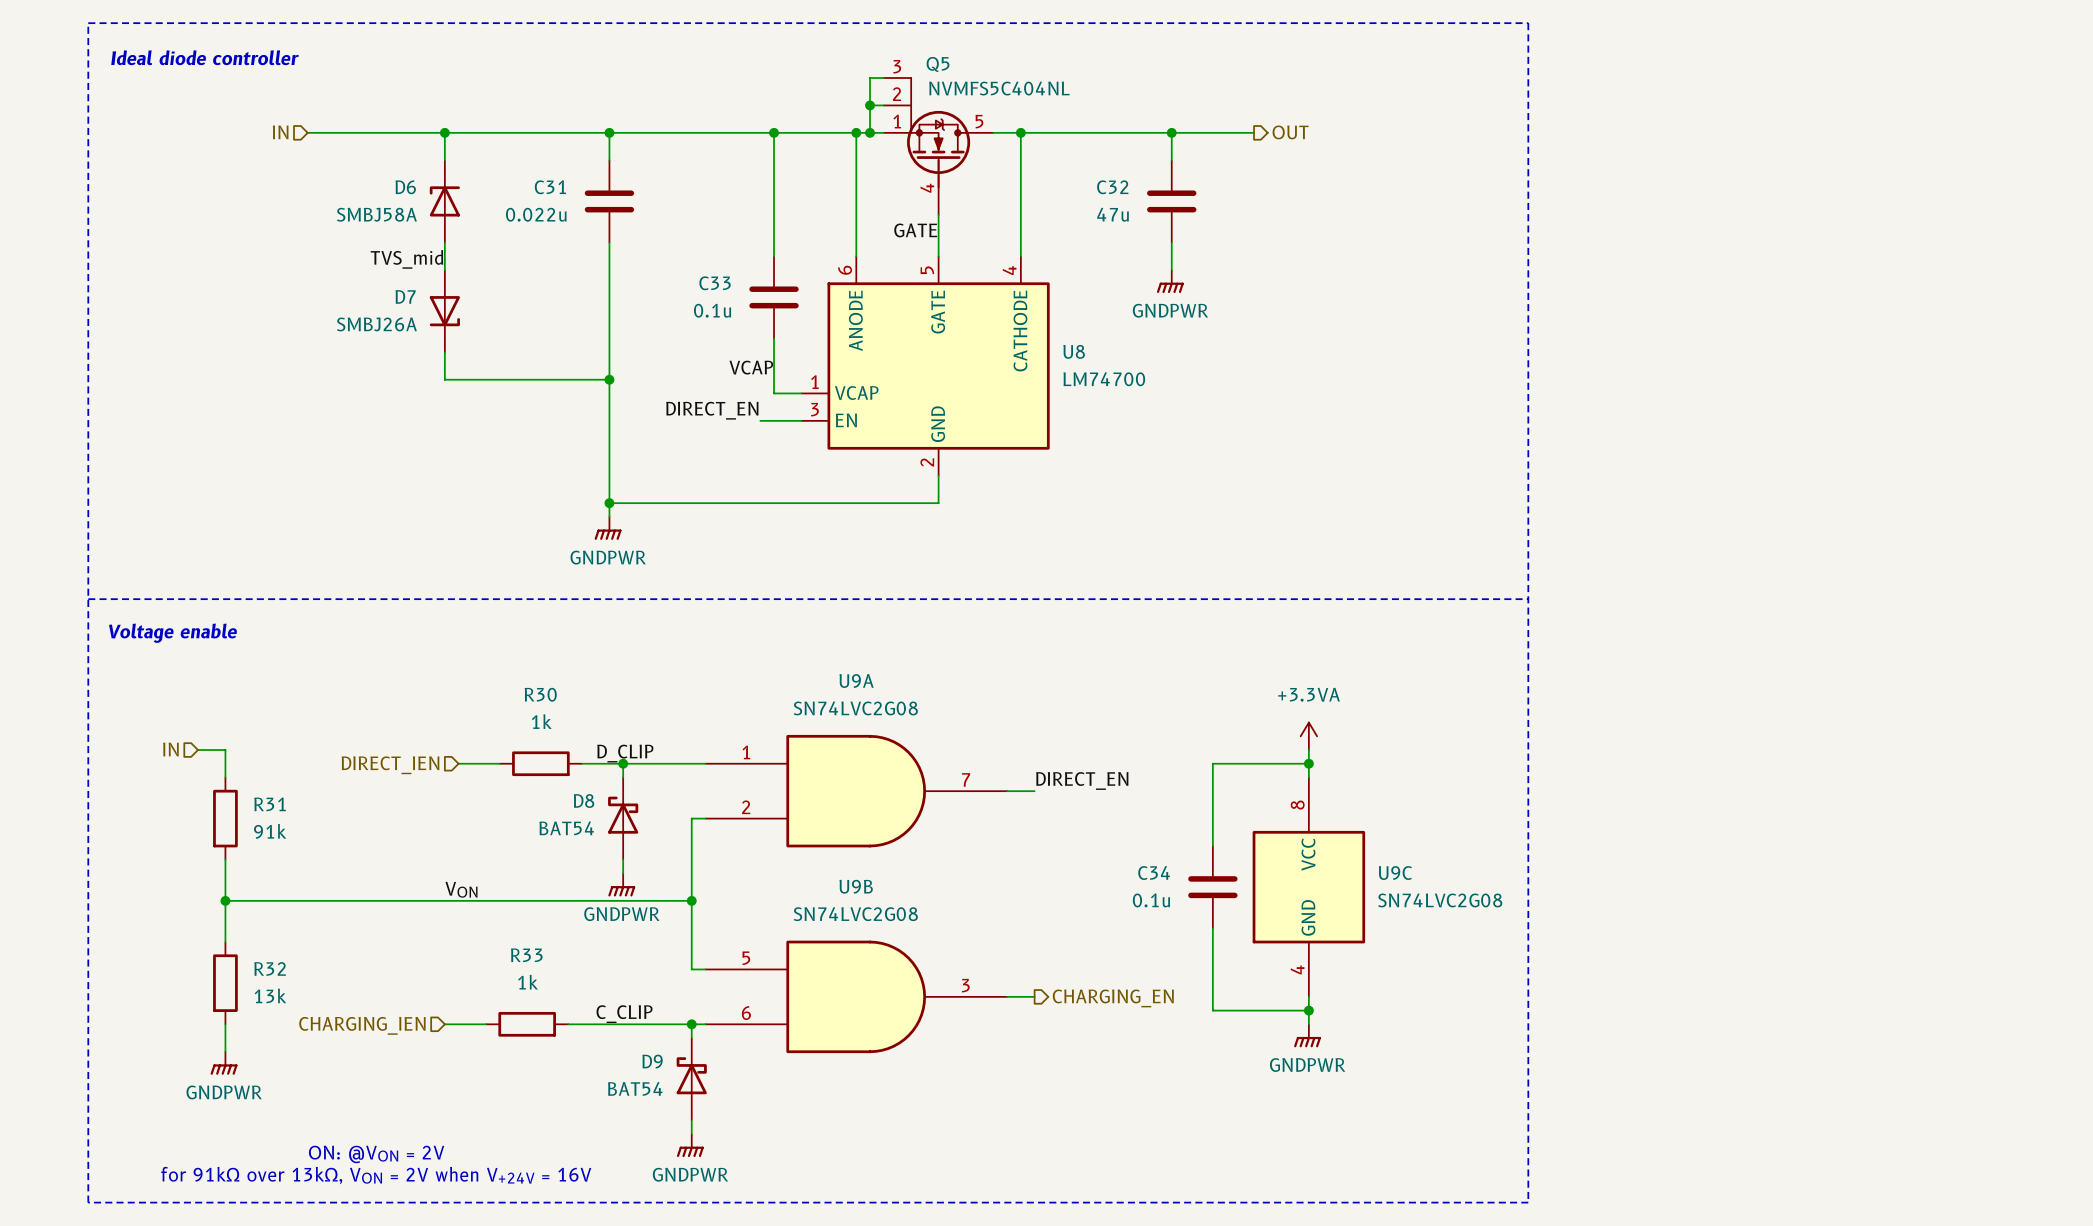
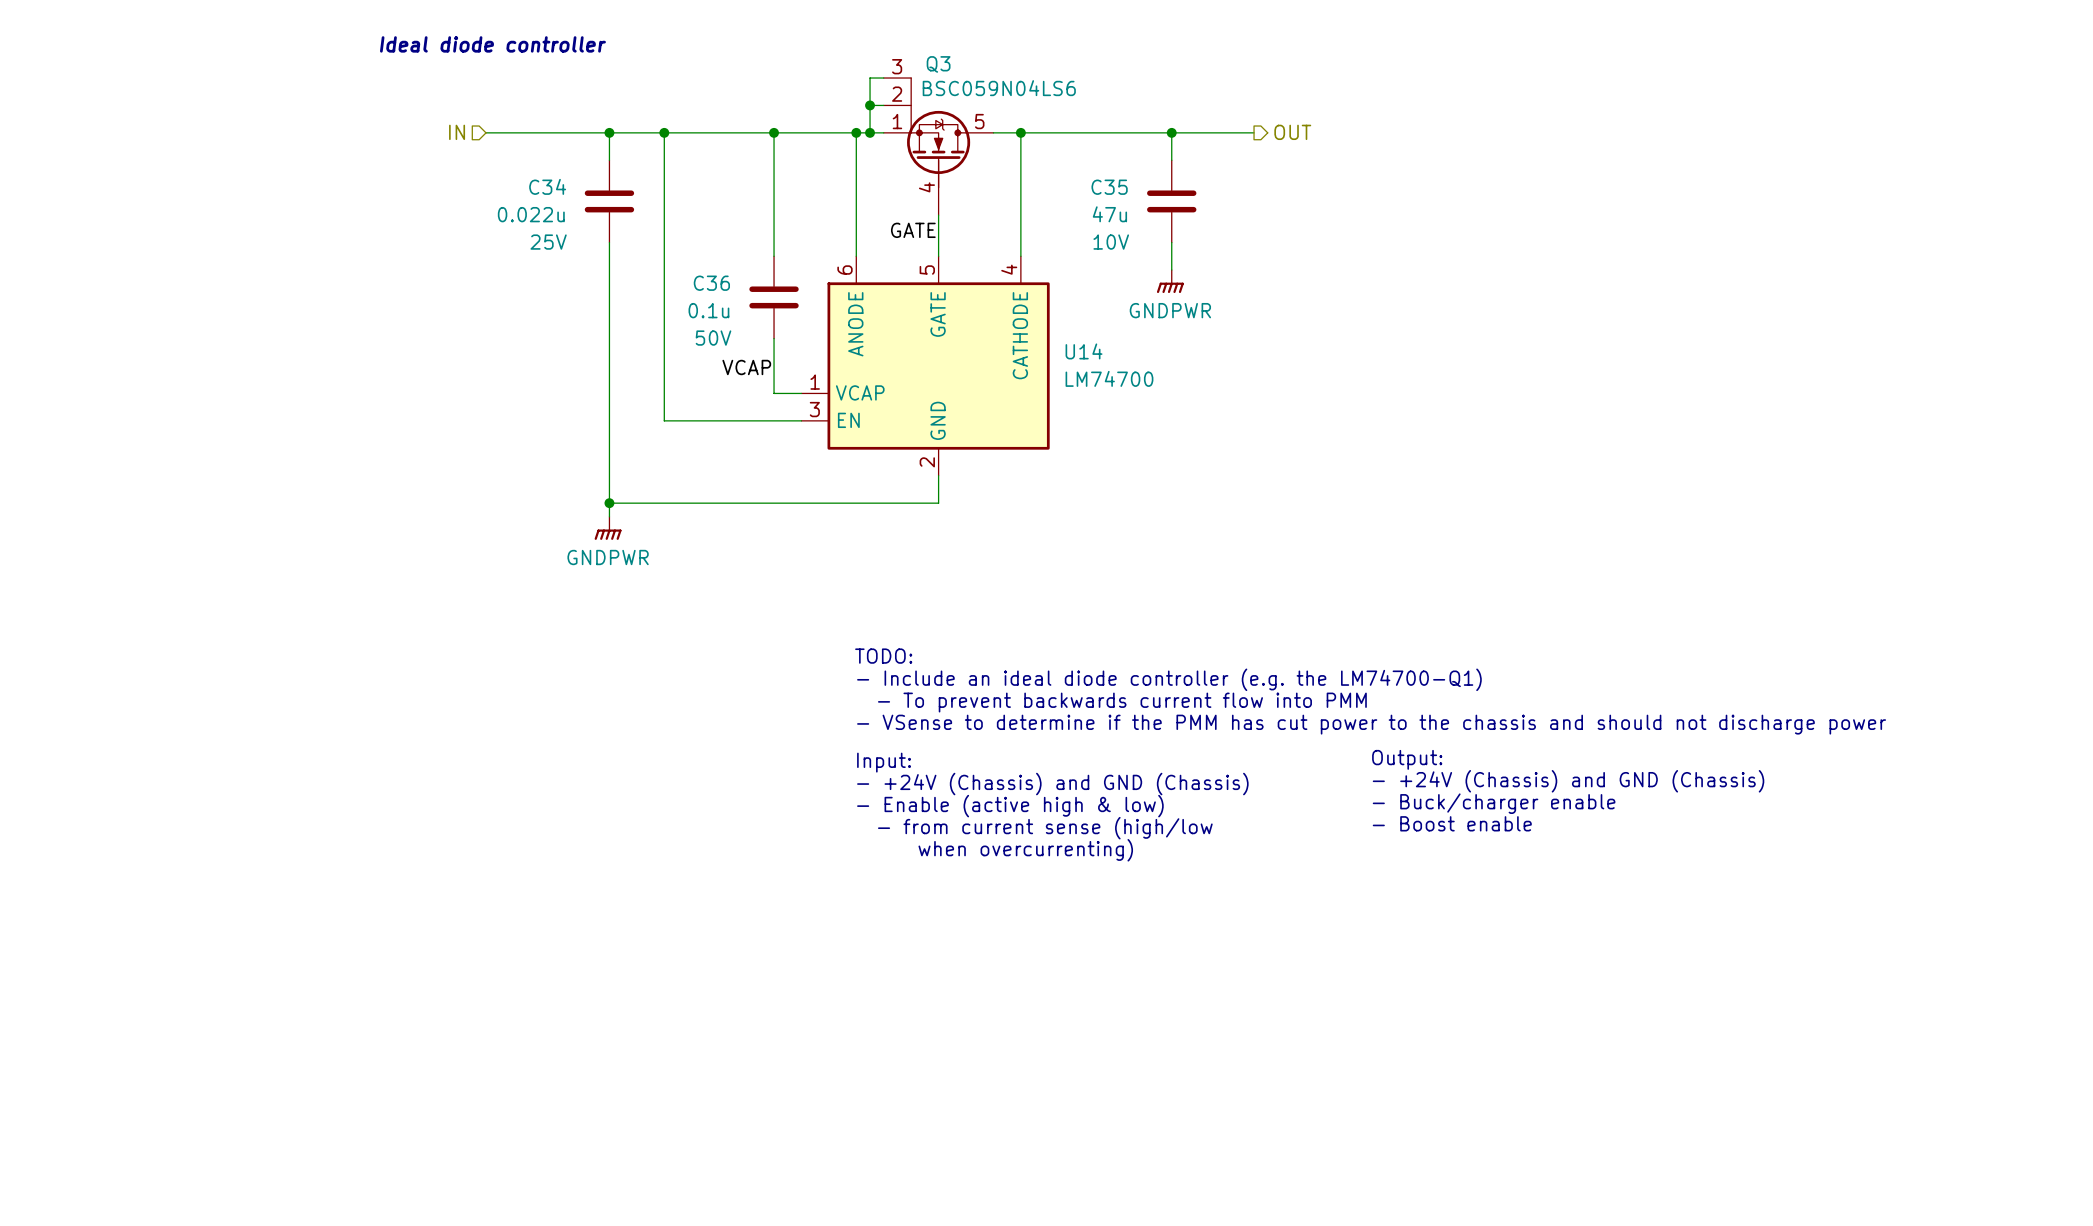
line: (88, 23) (1528, 23) (1528, 1202) (88, 1202) (88, 23) -> none
text position: Ideal diode controller (204, 57) -> Ideal diode controller (492, 44)
Q5 name: Q5 (938, 64) -> Q3 (938, 64)
Q5 value: NVMFS5C404NL (999, 88) -> BSC059N04LS6 (999, 88)
hierarchical label position: IN (280, 132) -> IN (457, 132)
wire: (307, 132) (486, 132) -> none
wire: (444, 132) (444, 160) -> none
junction: (444, 132) -> none
wire: none -> (664, 132) (664, 420) (760, 420)
junction: none -> (664, 132)
C31 name: C31 (550, 187) -> C34 (547, 186)
C32 name: C32 (1112, 187) -> C35 (1109, 187)
D6: SMBJ58A (444, 201) -> none
wire: (444, 242) (444, 270) -> none
C31 text: none -> 25V (548, 242)
C32 text: none -> 10V (1111, 242)
label: TVS_mid (406, 259) -> none
C33 name: C33 (715, 283) -> C36 (711, 283)
D7: SMBJ26A (444, 311) -> none
C33 text: none -> 50V (713, 338)
U8 name: U8 (1074, 351) -> U14 (1084, 351)
wire: (444, 352) (444, 379) (609, 379) -> none
junction: (609, 379) -> none
label: DIRECT_EN (712, 410) -> none
line: (88, 599) (1528, 599) -> none
text: Voltage enable (172, 633) -> none
text: none -> TODO: (883, 656)
text: none -> - Include an ideal diode controller (e.g. the LM74700-Q1) (1169, 679)
text: none -> - To prevent backwards current flow into PMM (1122, 702)
text: none -> - VSense to determine if the PMM has cut power to the chassis and should not discharge power (1371, 724)
power symbol: +3.3VA (1308, 736) -> none
hierarchical label: IN (170, 749) -> none
wire: (198, 750) (225, 750) (225, 777) -> none
wire: (1308, 750) (1308, 777) -> none
label: D_CLIP (625, 753) -> none
text: none -> Output: (1407, 759)
text: none -> Input: (884, 762)
wire: (458, 763) (499, 763) -> none
R30: 1k (540, 763) -> none
wire: (582, 763) (705, 763) -> none
wire: (623, 763) (623, 777) -> none
junction: (623, 763) -> none
wire: (1308, 763) (1212, 763) (1212, 846) -> none
junction: (1308, 763) -> none
hierarchical label: DIRECT_IEN (390, 765) -> none
label: DIRECT_EN (1082, 780) -> none
text: none -> - +24V (Chassis) and GND (Chassis) (1568, 781)
text: none -> - +24V (Chassis) and GND (Chassis) (1052, 784)
U9A: SN74LVC2G08 (856, 791) -> none
wire: (1007, 791) (1034, 791) -> none
text: none -> - Buck/charger enable (1494, 803)
text: none -> - Enable (active high & low) (1010, 806)
R31: 91k (225, 818) -> none
D8: BAT54 (623, 818) -> none
wire: (705, 818) (691, 818) (691, 969) (705, 969) -> none
text: none -> - Boost enable (1452, 823)
text: none -> - from current sense (high/low (1045, 828)
text: none -> when overcurrenting) (1025, 850)
wire: (225, 859) (225, 942) -> none
wire: (623, 859) (623, 873) -> none
power symbol: GNDPWR (621, 884) -> none
C34: 0.1u (1212, 887) -> none
U9C: SN74LVC2G08 (1308, 887) -> none
label: VON (461, 889) -> none
wire: (225, 900) (691, 900) -> none
junction: (225, 900) -> none
junction: (691, 900) -> none
wire: (1212, 928) (1212, 1010) (1308, 1010) -> none
R32: 13k (225, 983) -> none
U9B: SN74LVC2G08 (856, 996) -> none
wire: (1007, 996) (1034, 996) -> none
wire: (1308, 996) (1308, 1024) -> none
hierarchical label: CHARGING_EN (1113, 998) -> none
junction: (1308, 1010) -> none
label: C_CLIP (624, 1014) -> none
wire: (225, 1024) (225, 1051) -> none
wire: (444, 1024) (486, 1024) -> none
R33: 1k (527, 1024) -> none
wire: (568, 1024) (705, 1024) -> none
wire: (691, 1024) (691, 1038) -> none
junction: (691, 1024) -> none
hierarchical label: CHARGING_IEN (362, 1025) -> none
power symbol: GNDPWR (1307, 1035) -> none
power symbol: GNDPWR (224, 1063) -> none
D9: BAT54 (691, 1079) -> none
wire: (691, 1120) (691, 1134) -> none
power symbol: GNDPWR (690, 1145) -> none
text: ON: @VON = 2V (376, 1154) -> none
text: for 91kΩ over 13kΩ, VON = 2V when V+24V = 16V (376, 1175) -> none

